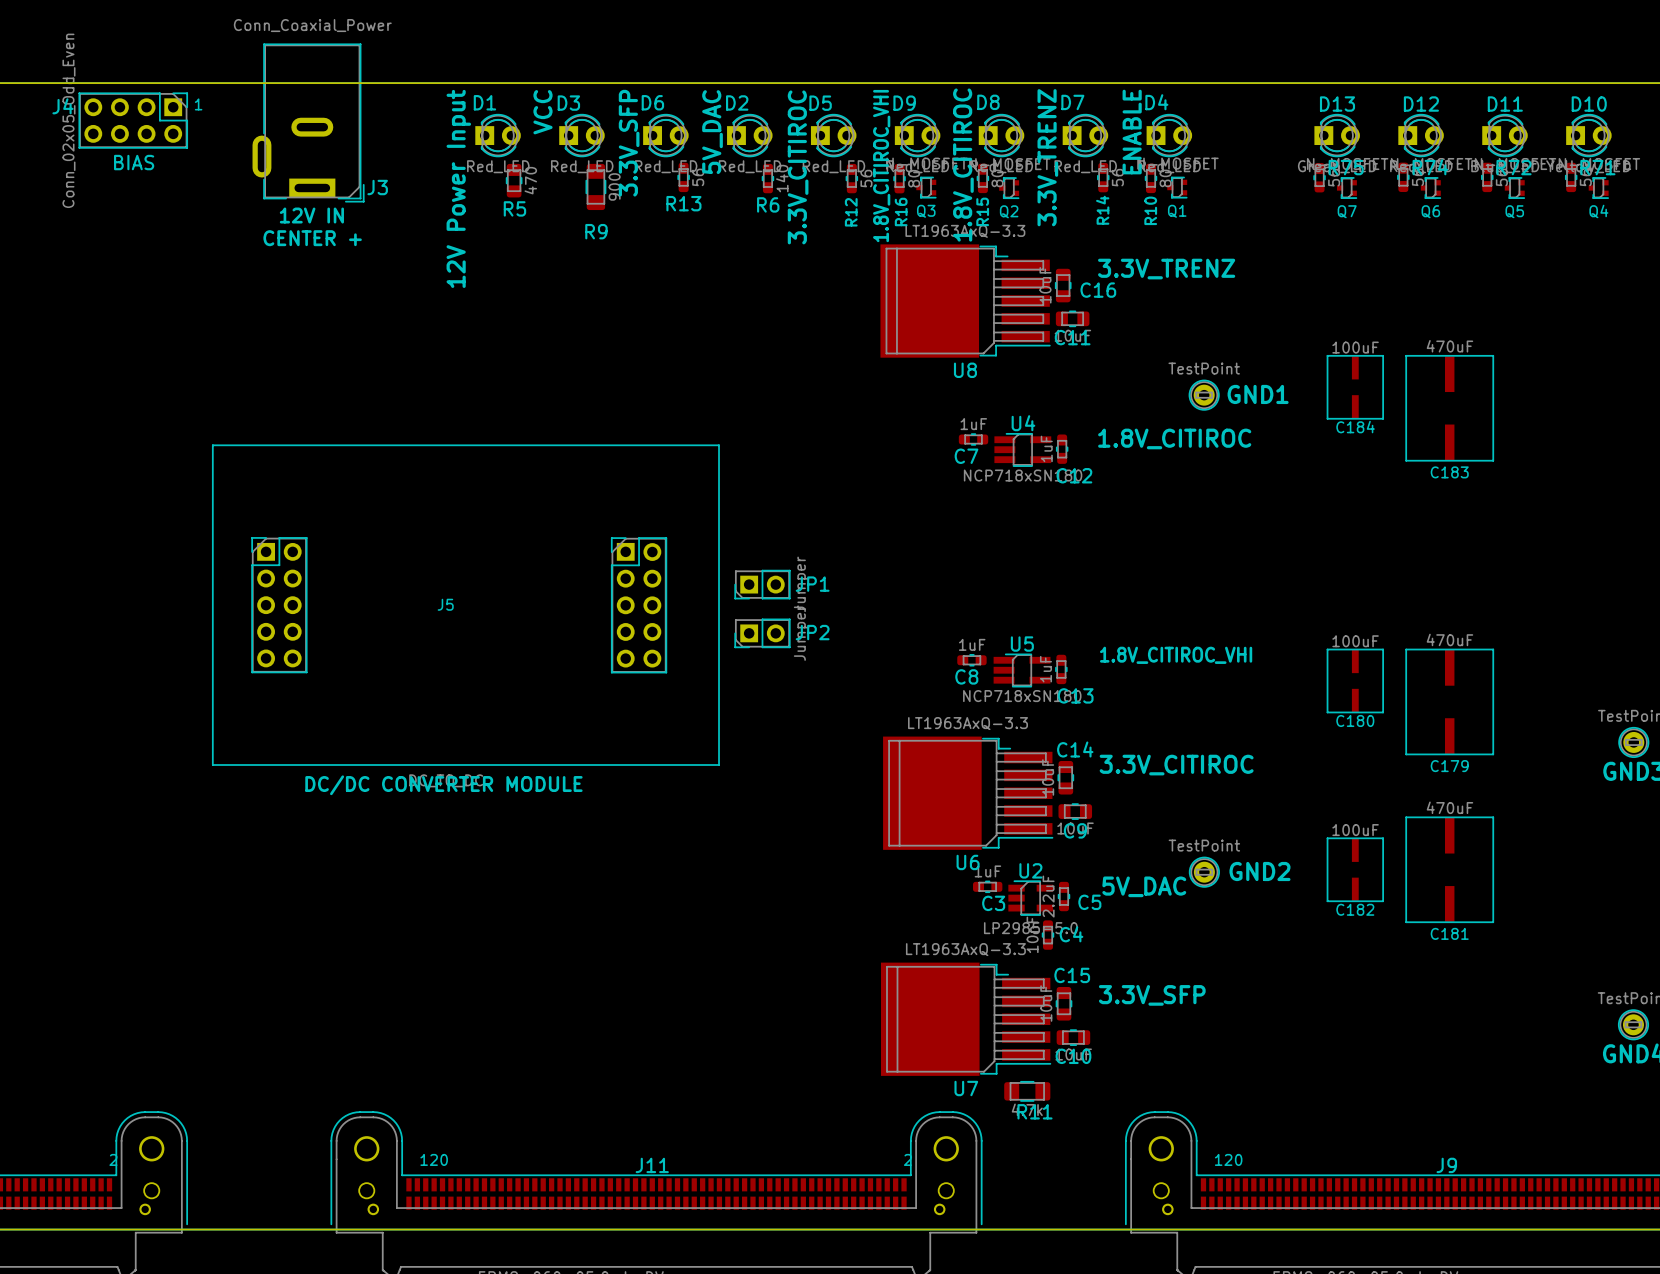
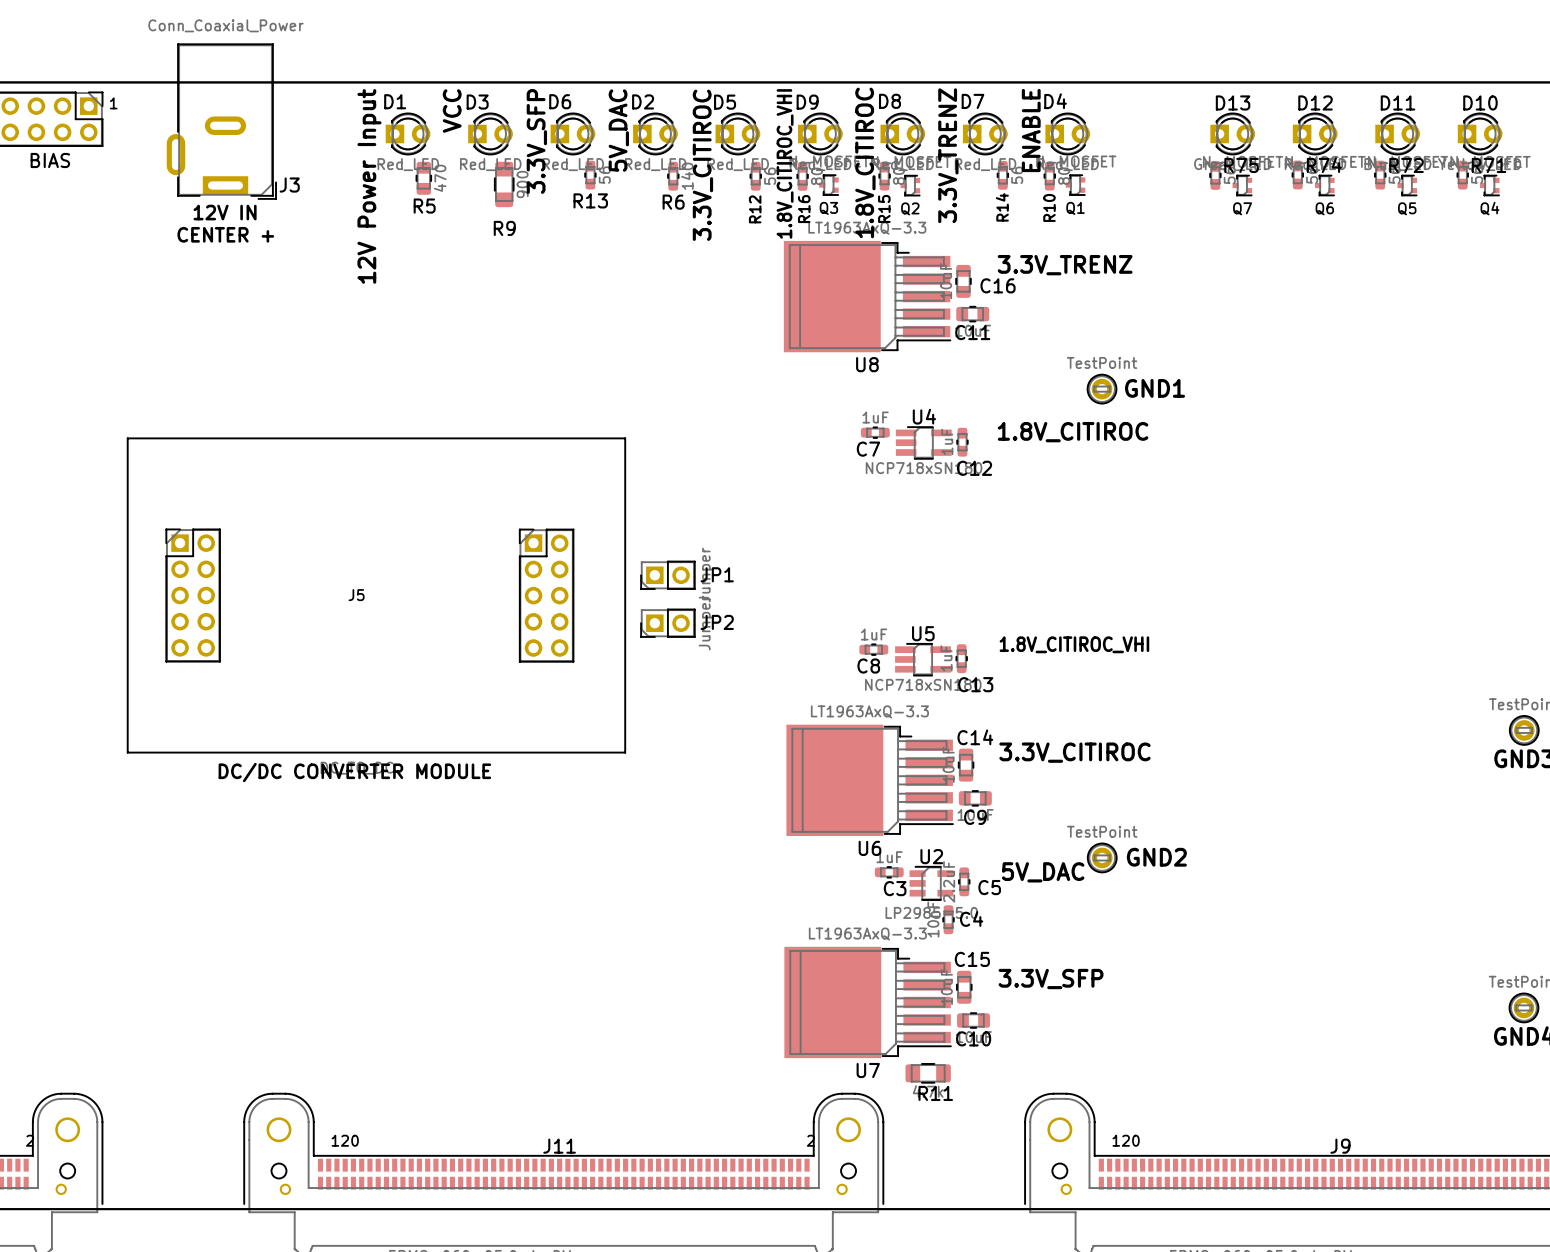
C184: 100uF (1355, 387) -> none
C183: 470uF (1449, 408) -> none
C180: 100uF (1355, 680) -> none
C179: 470uF (1449, 701) -> none
C182: 100uF (1355, 869) -> none
C181: 470uF (1449, 869) -> none

